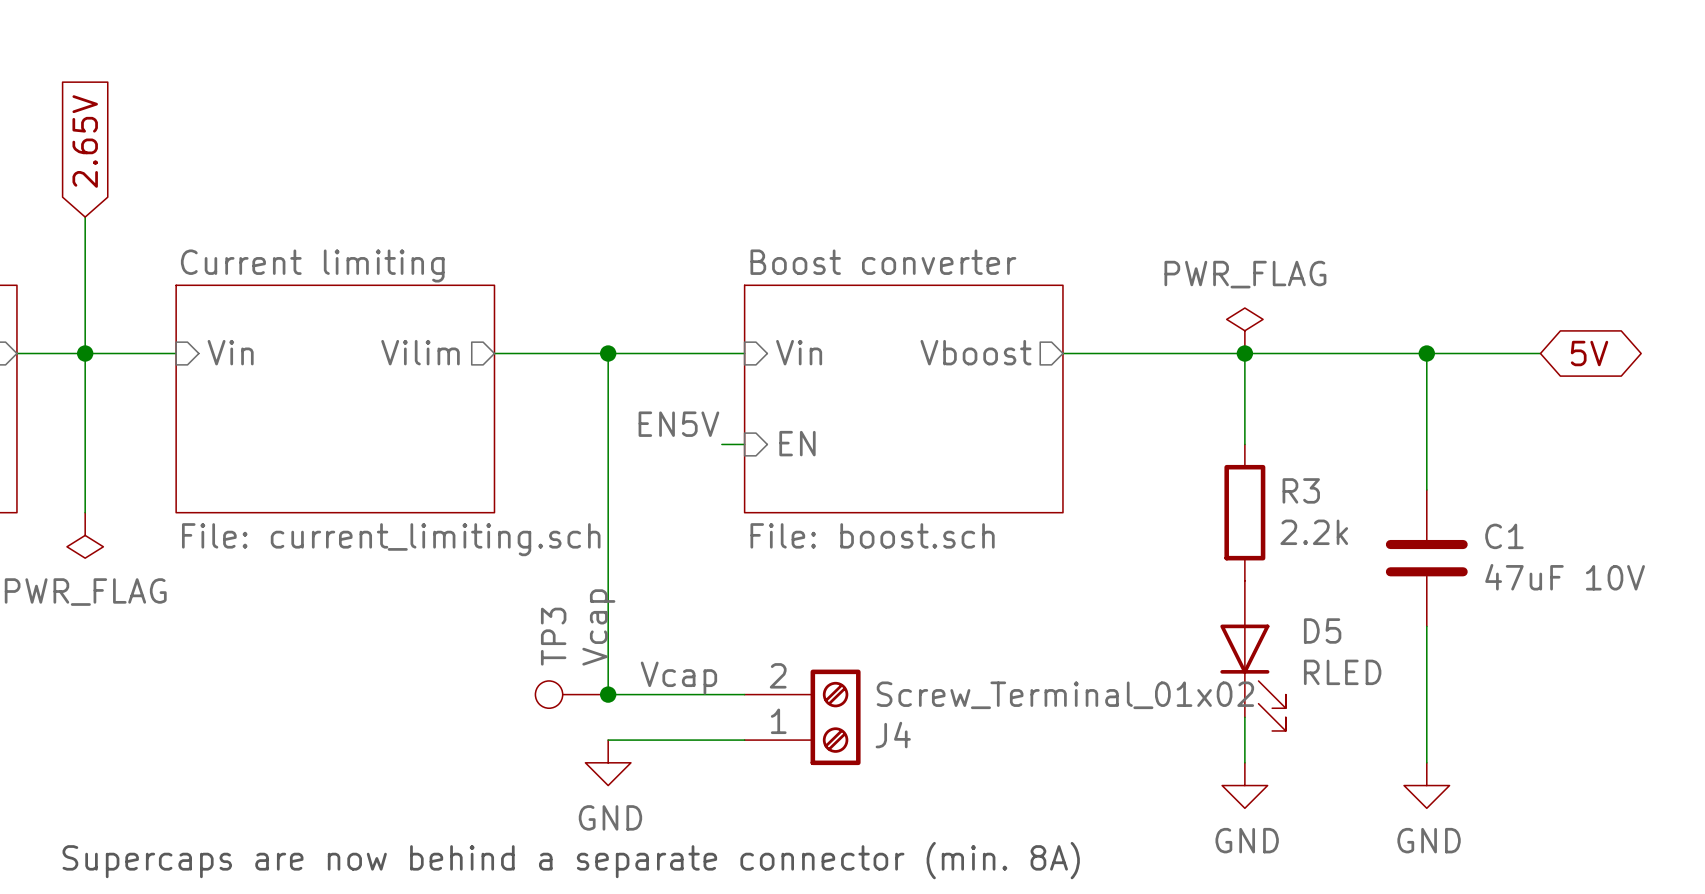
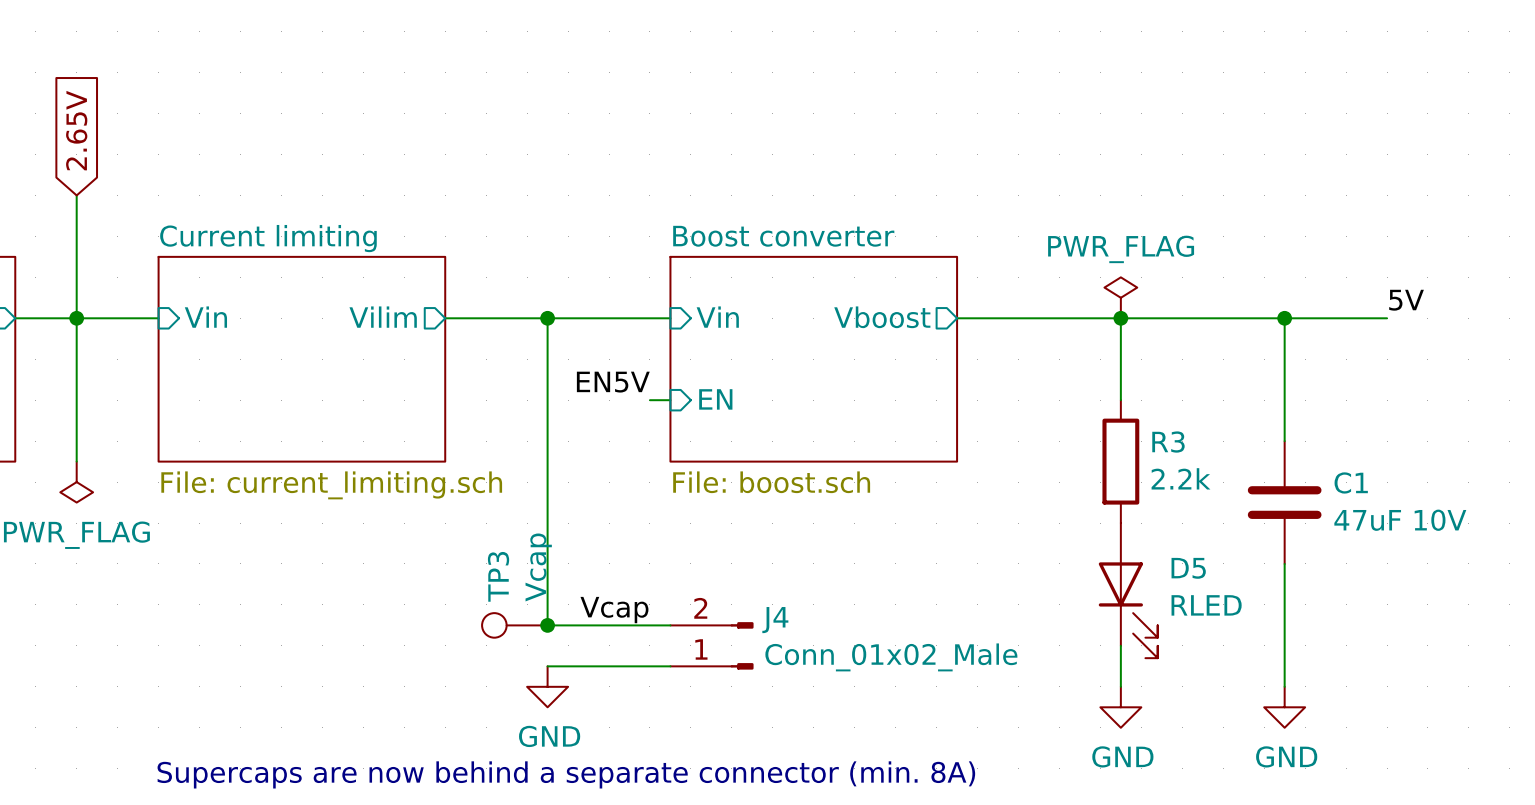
label: none -> 5V (1406, 300)
global label: 5V (1589, 353) -> none
J4 symbol: [744, 669, 861, 766] -> [670, 622, 754, 670]
J4 value: Screw_Terminal_01x02 (1065, 695) -> Conn_01x02_Male (891, 657)
J4 name position: J4 (893, 735) -> J4 (775, 620)

